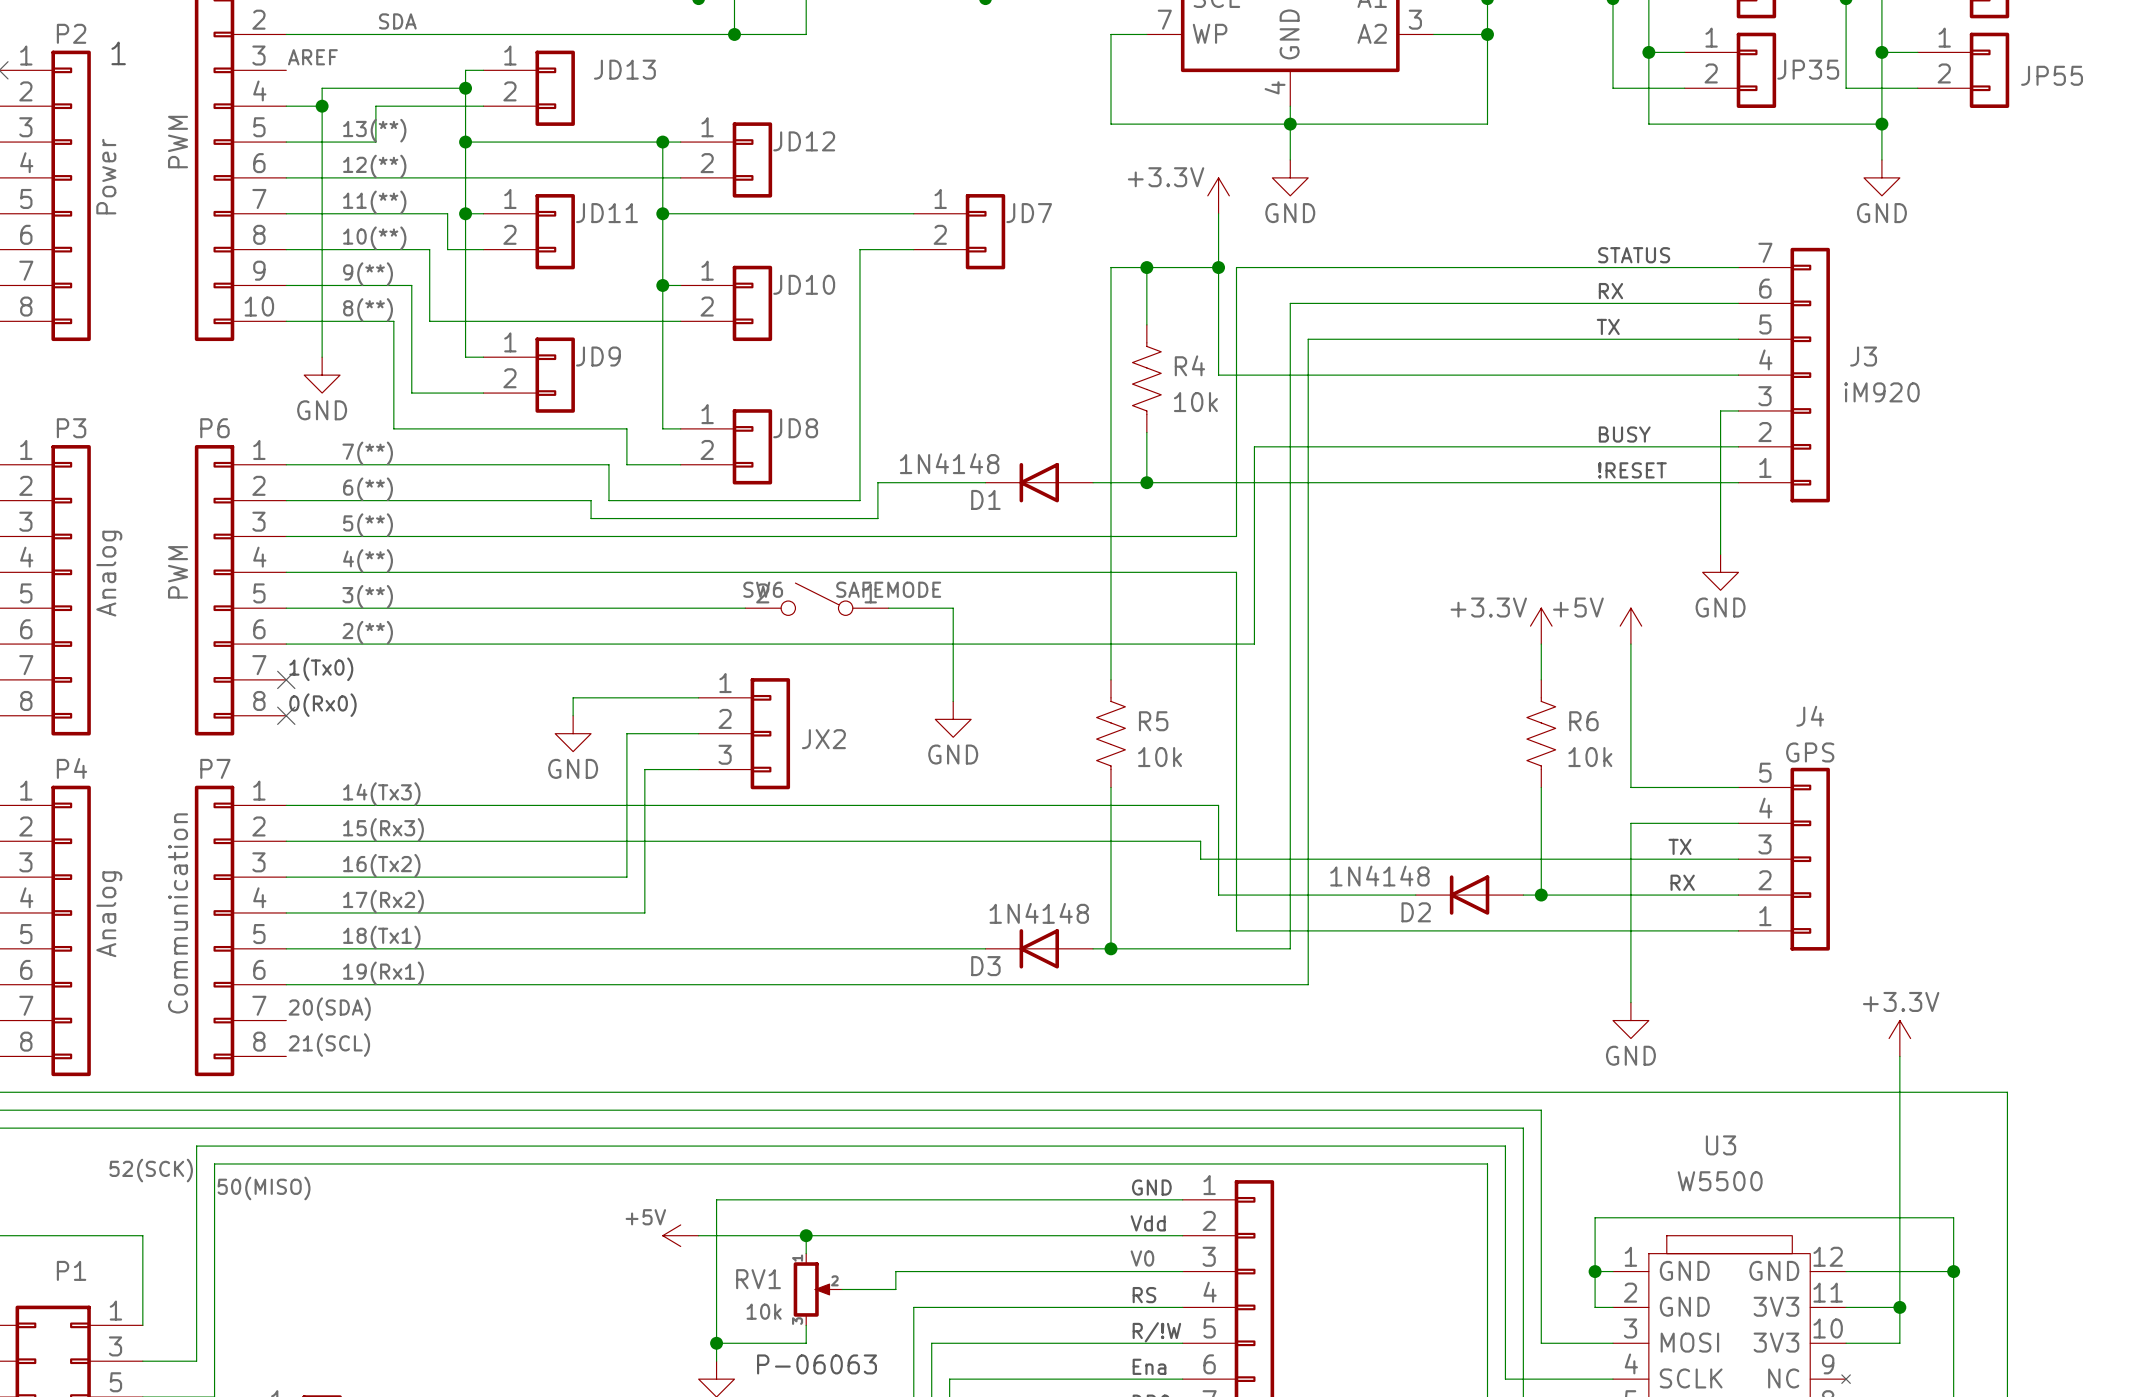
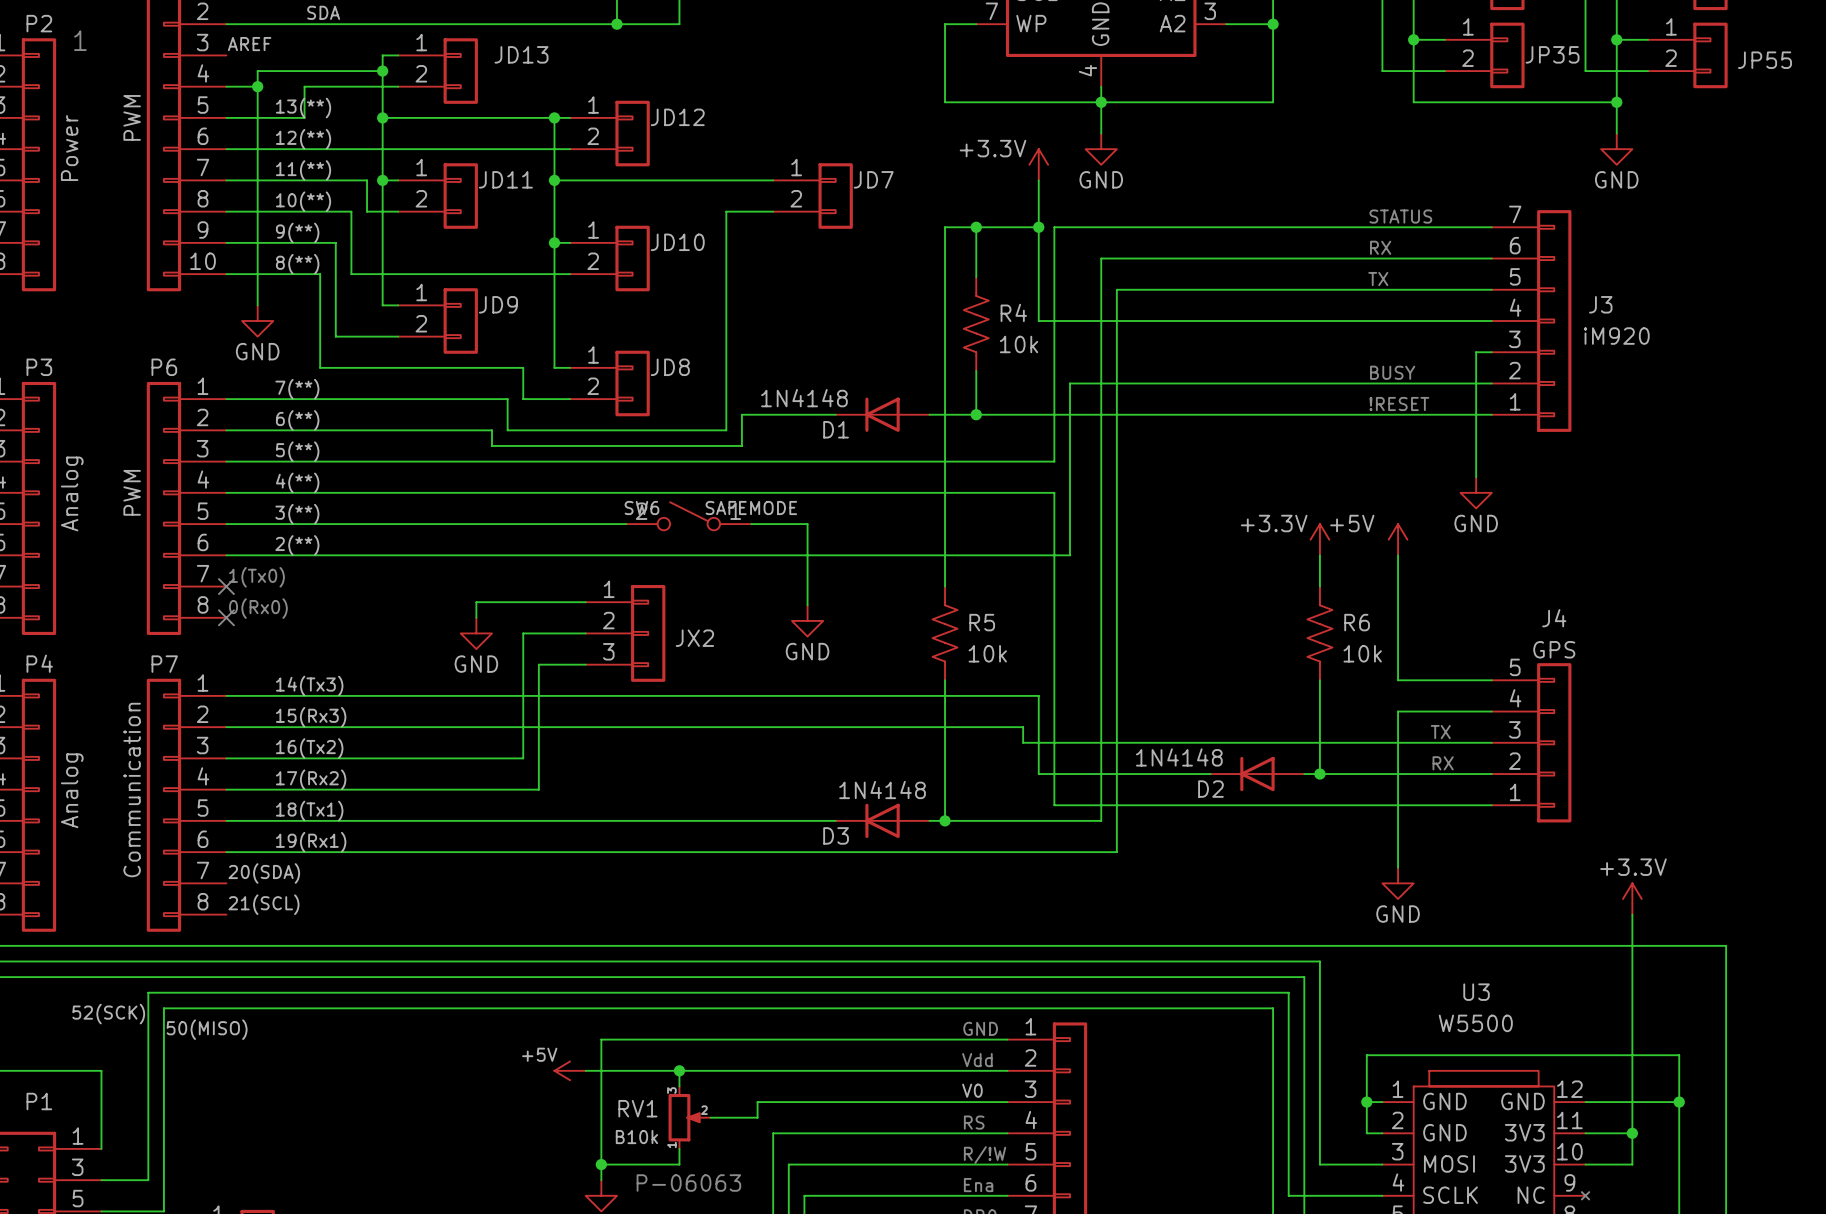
RV1 flip: as is (811, 1289) -> up-down (684, 1117)
RV1 value: 10k (764, 1311) -> B10k (636, 1137)

